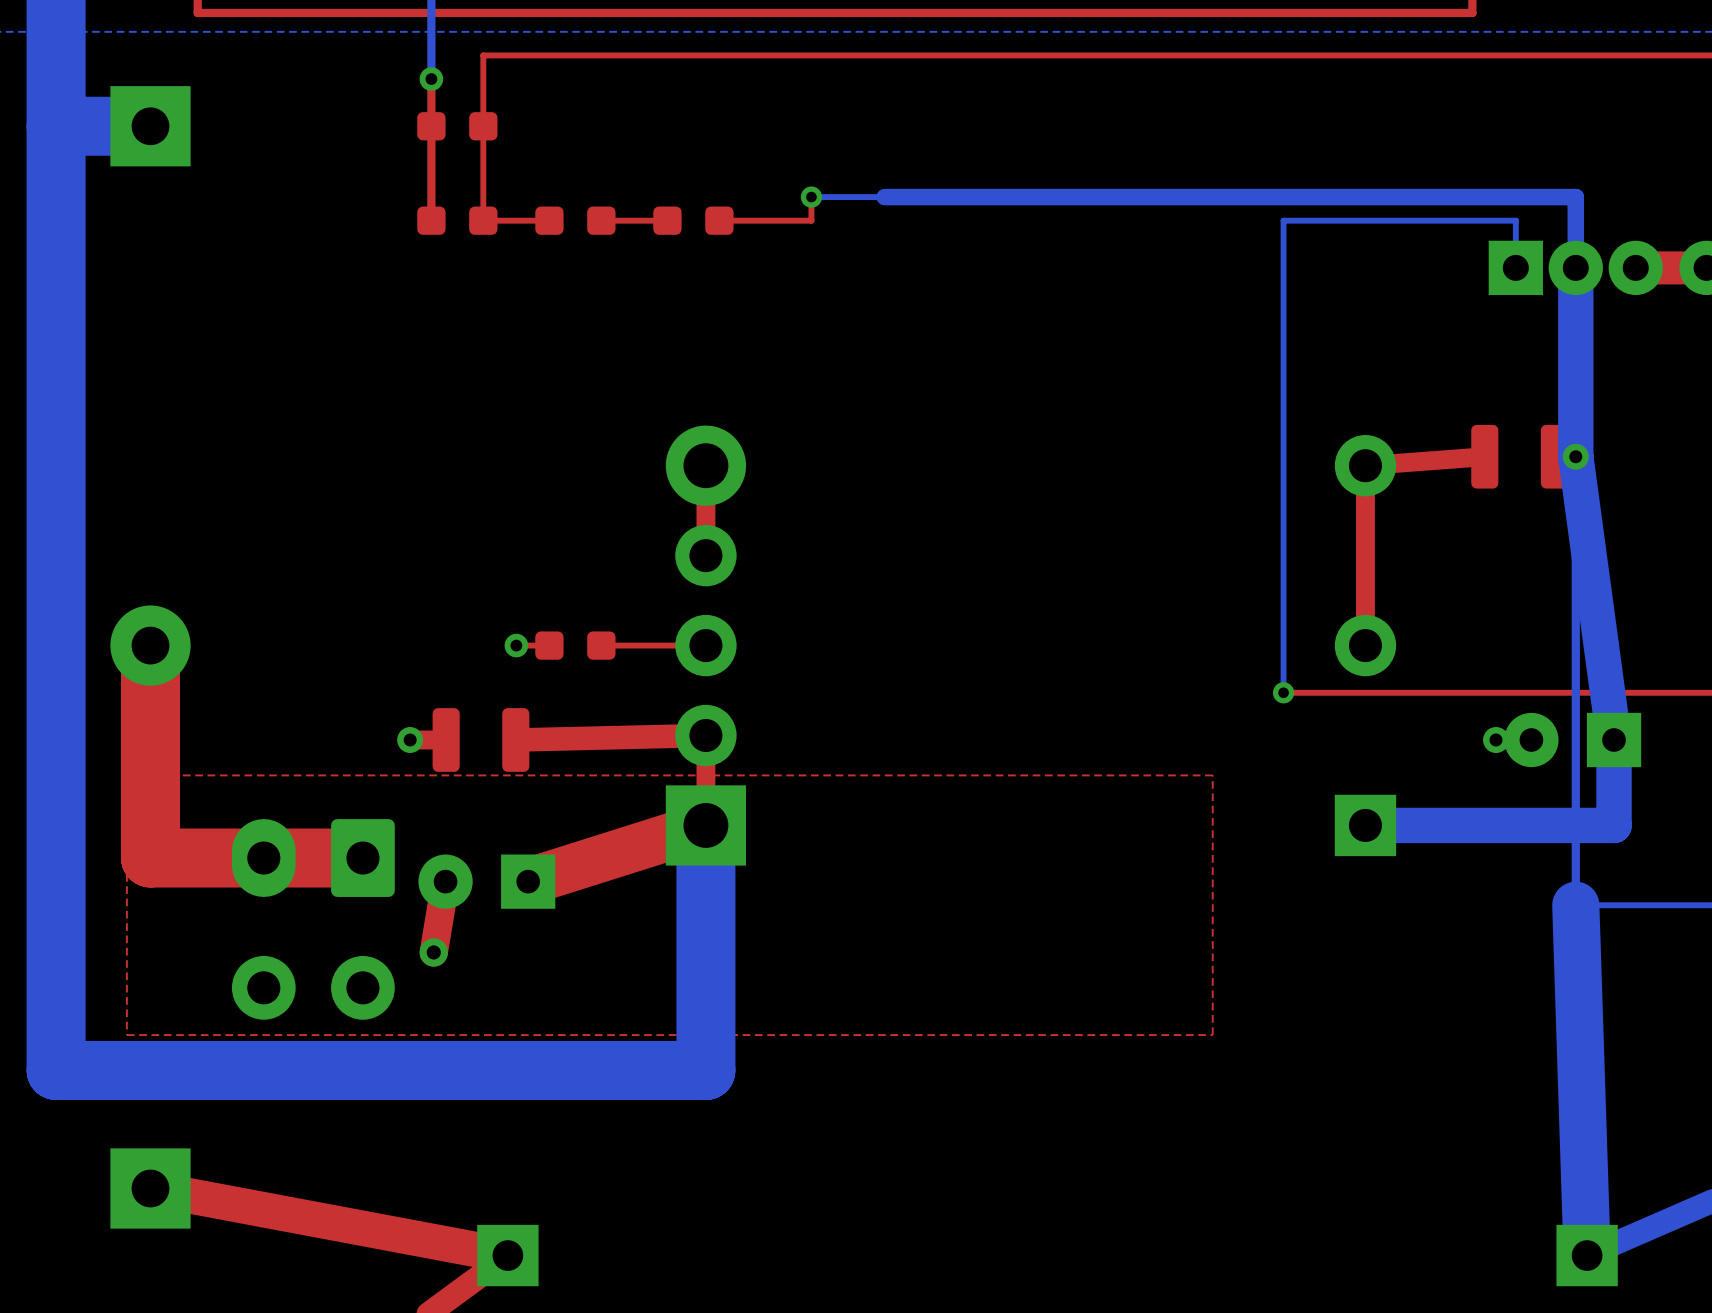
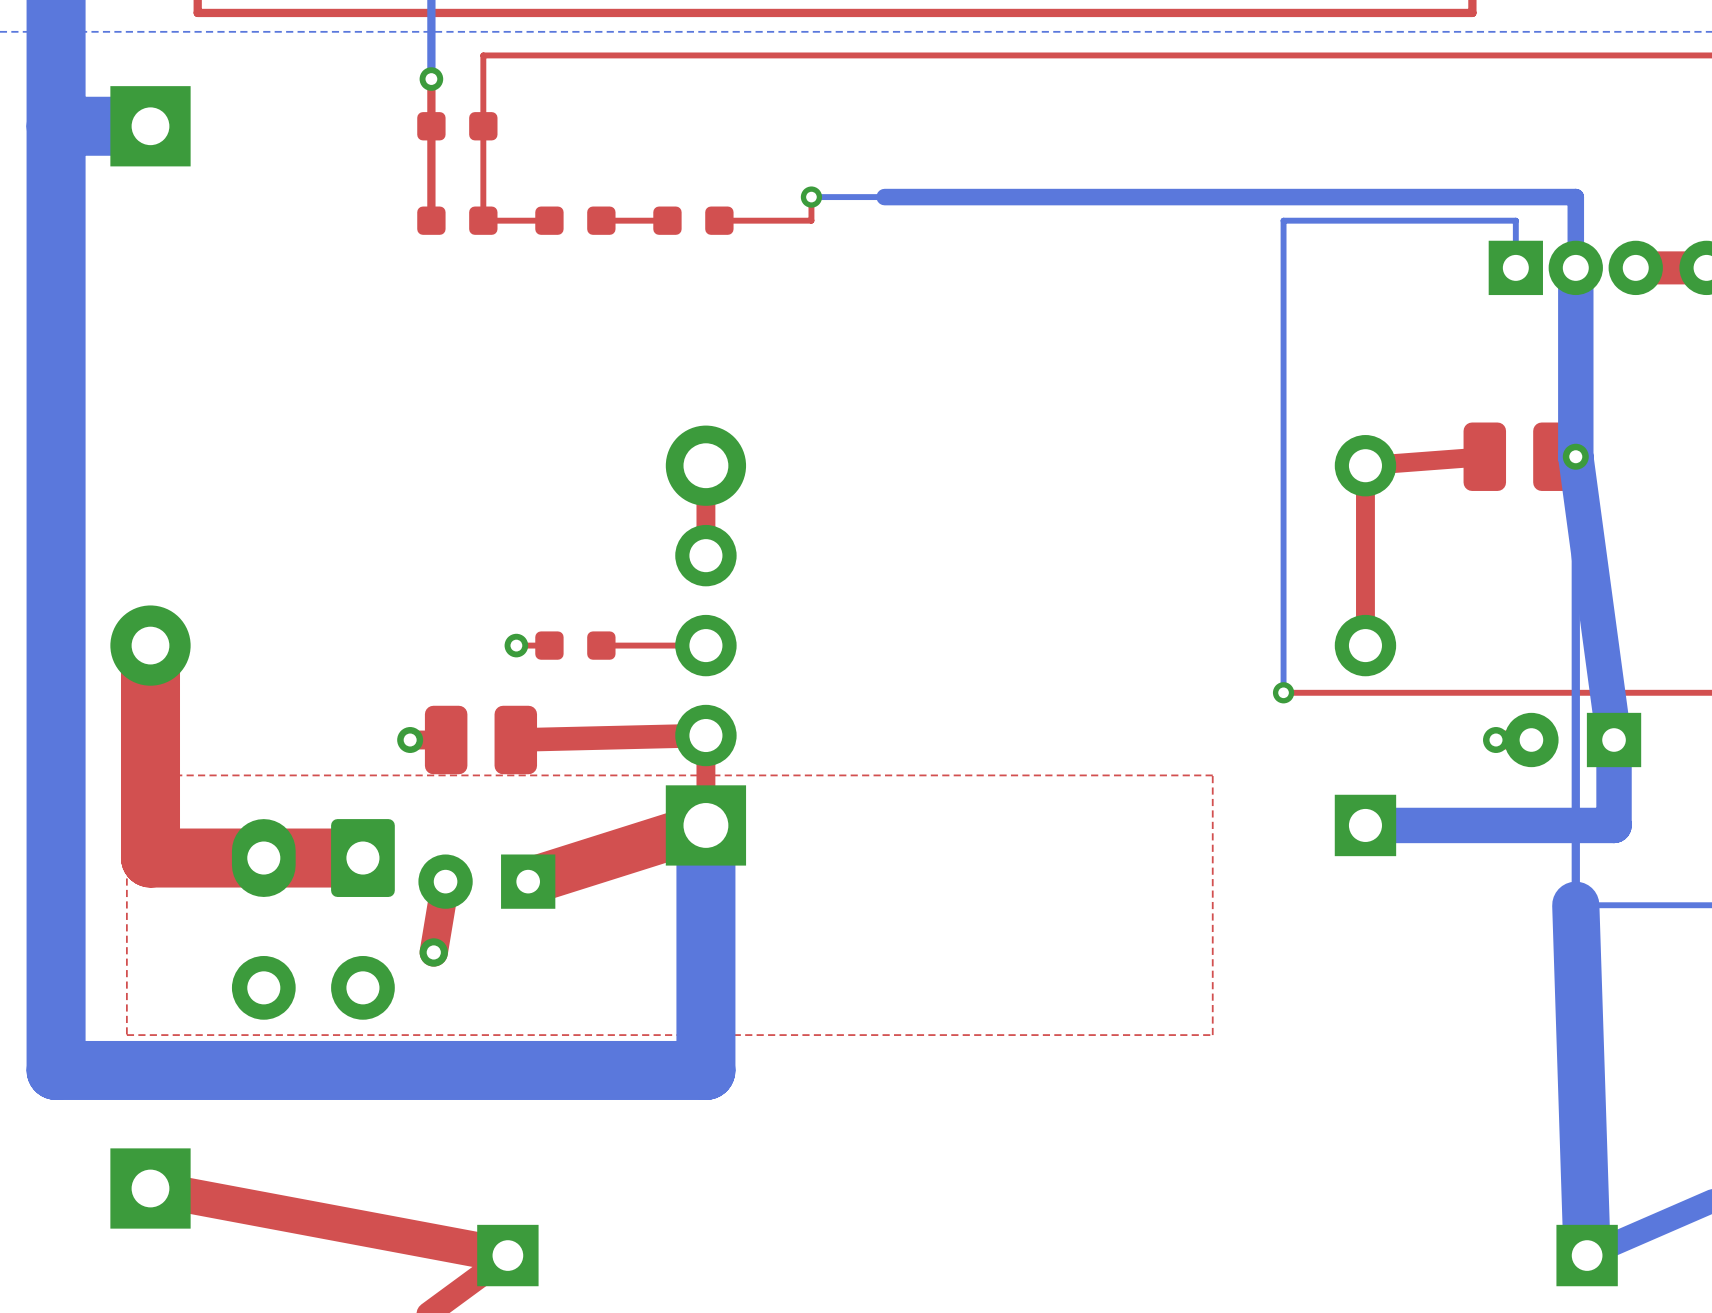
part footprint: [1471, 424, 1569, 489] -> [1463, 422, 1576, 491]
part footprint: [432, 708, 530, 772] -> [424, 705, 538, 775]

